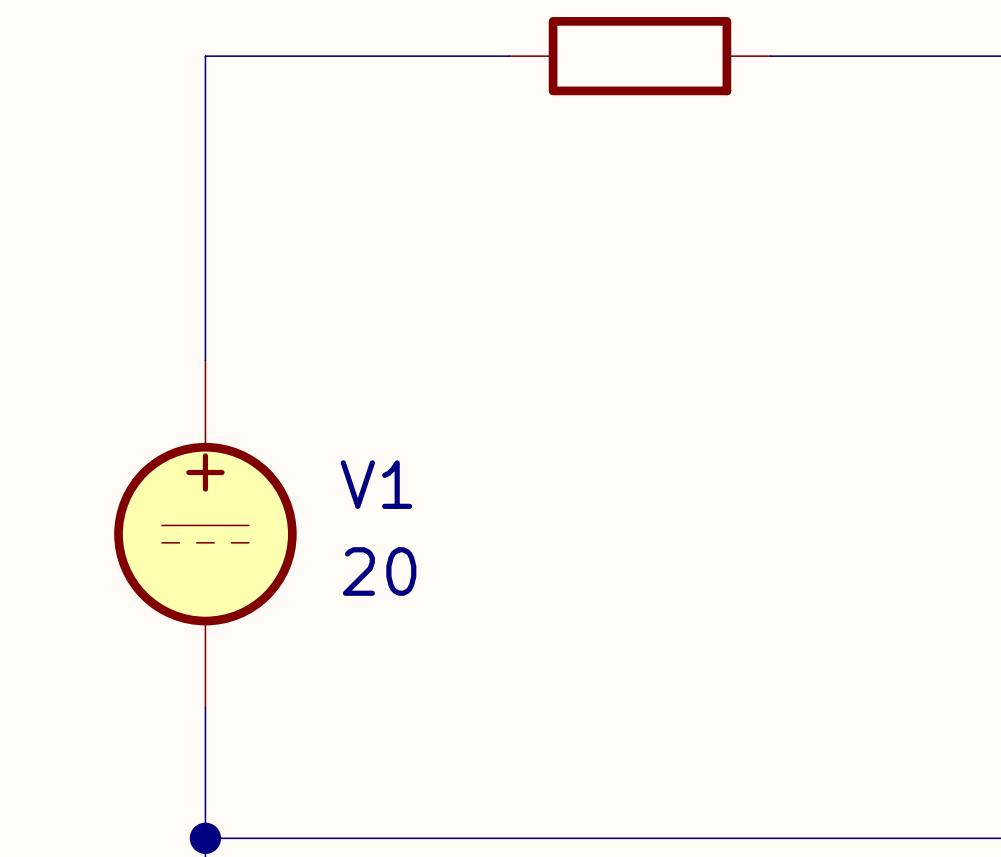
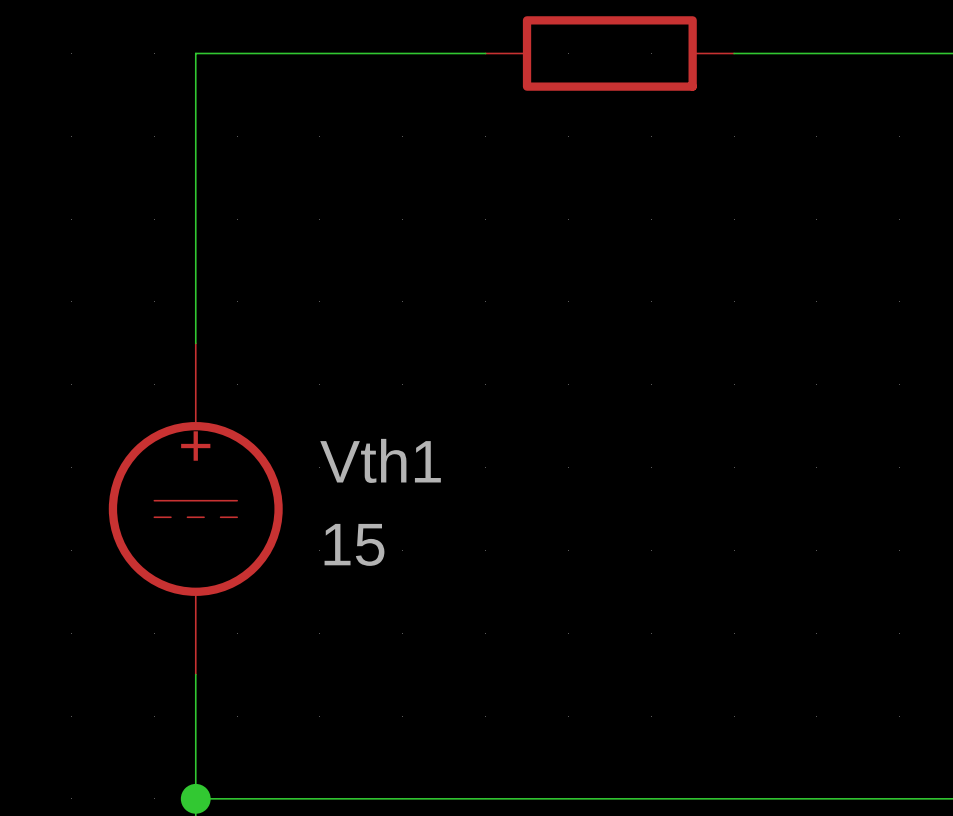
V1 name: V1 (376, 484) -> Vth1 (380, 460)
V1 value: 20 (379, 571) -> 15 (354, 544)

